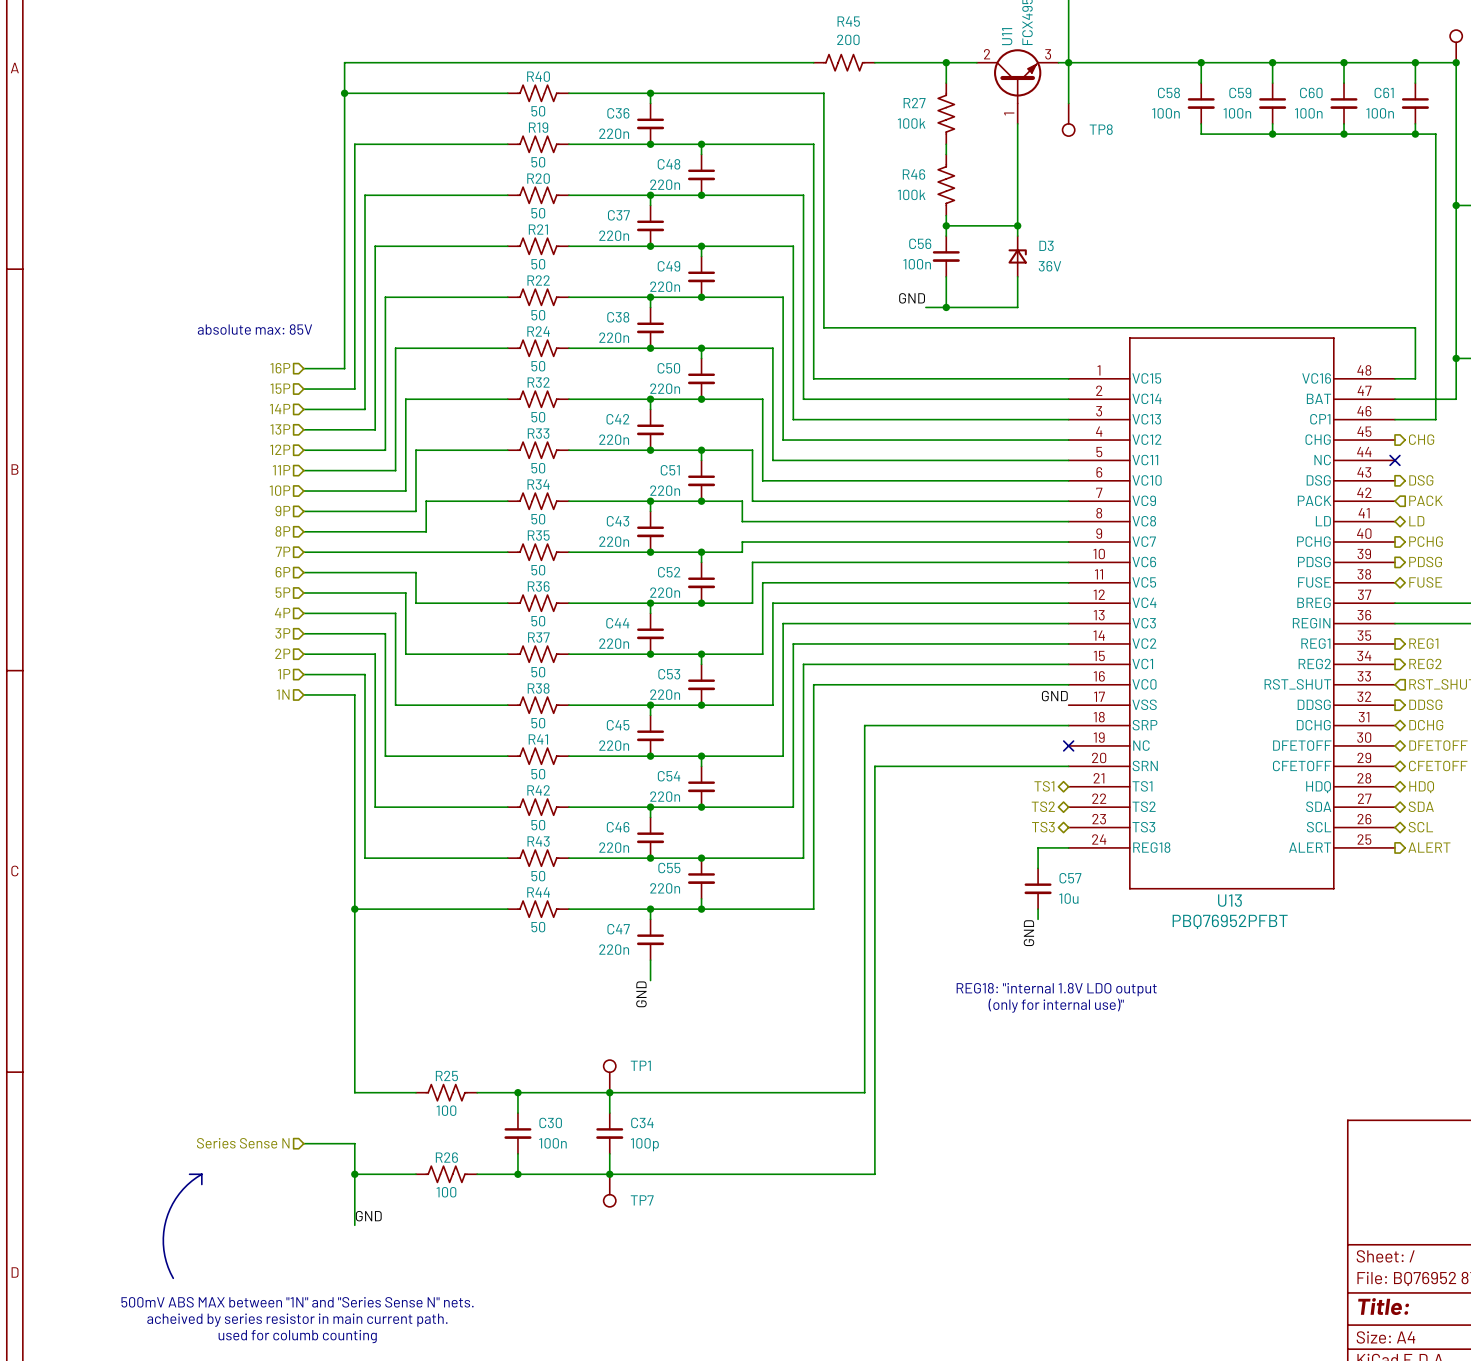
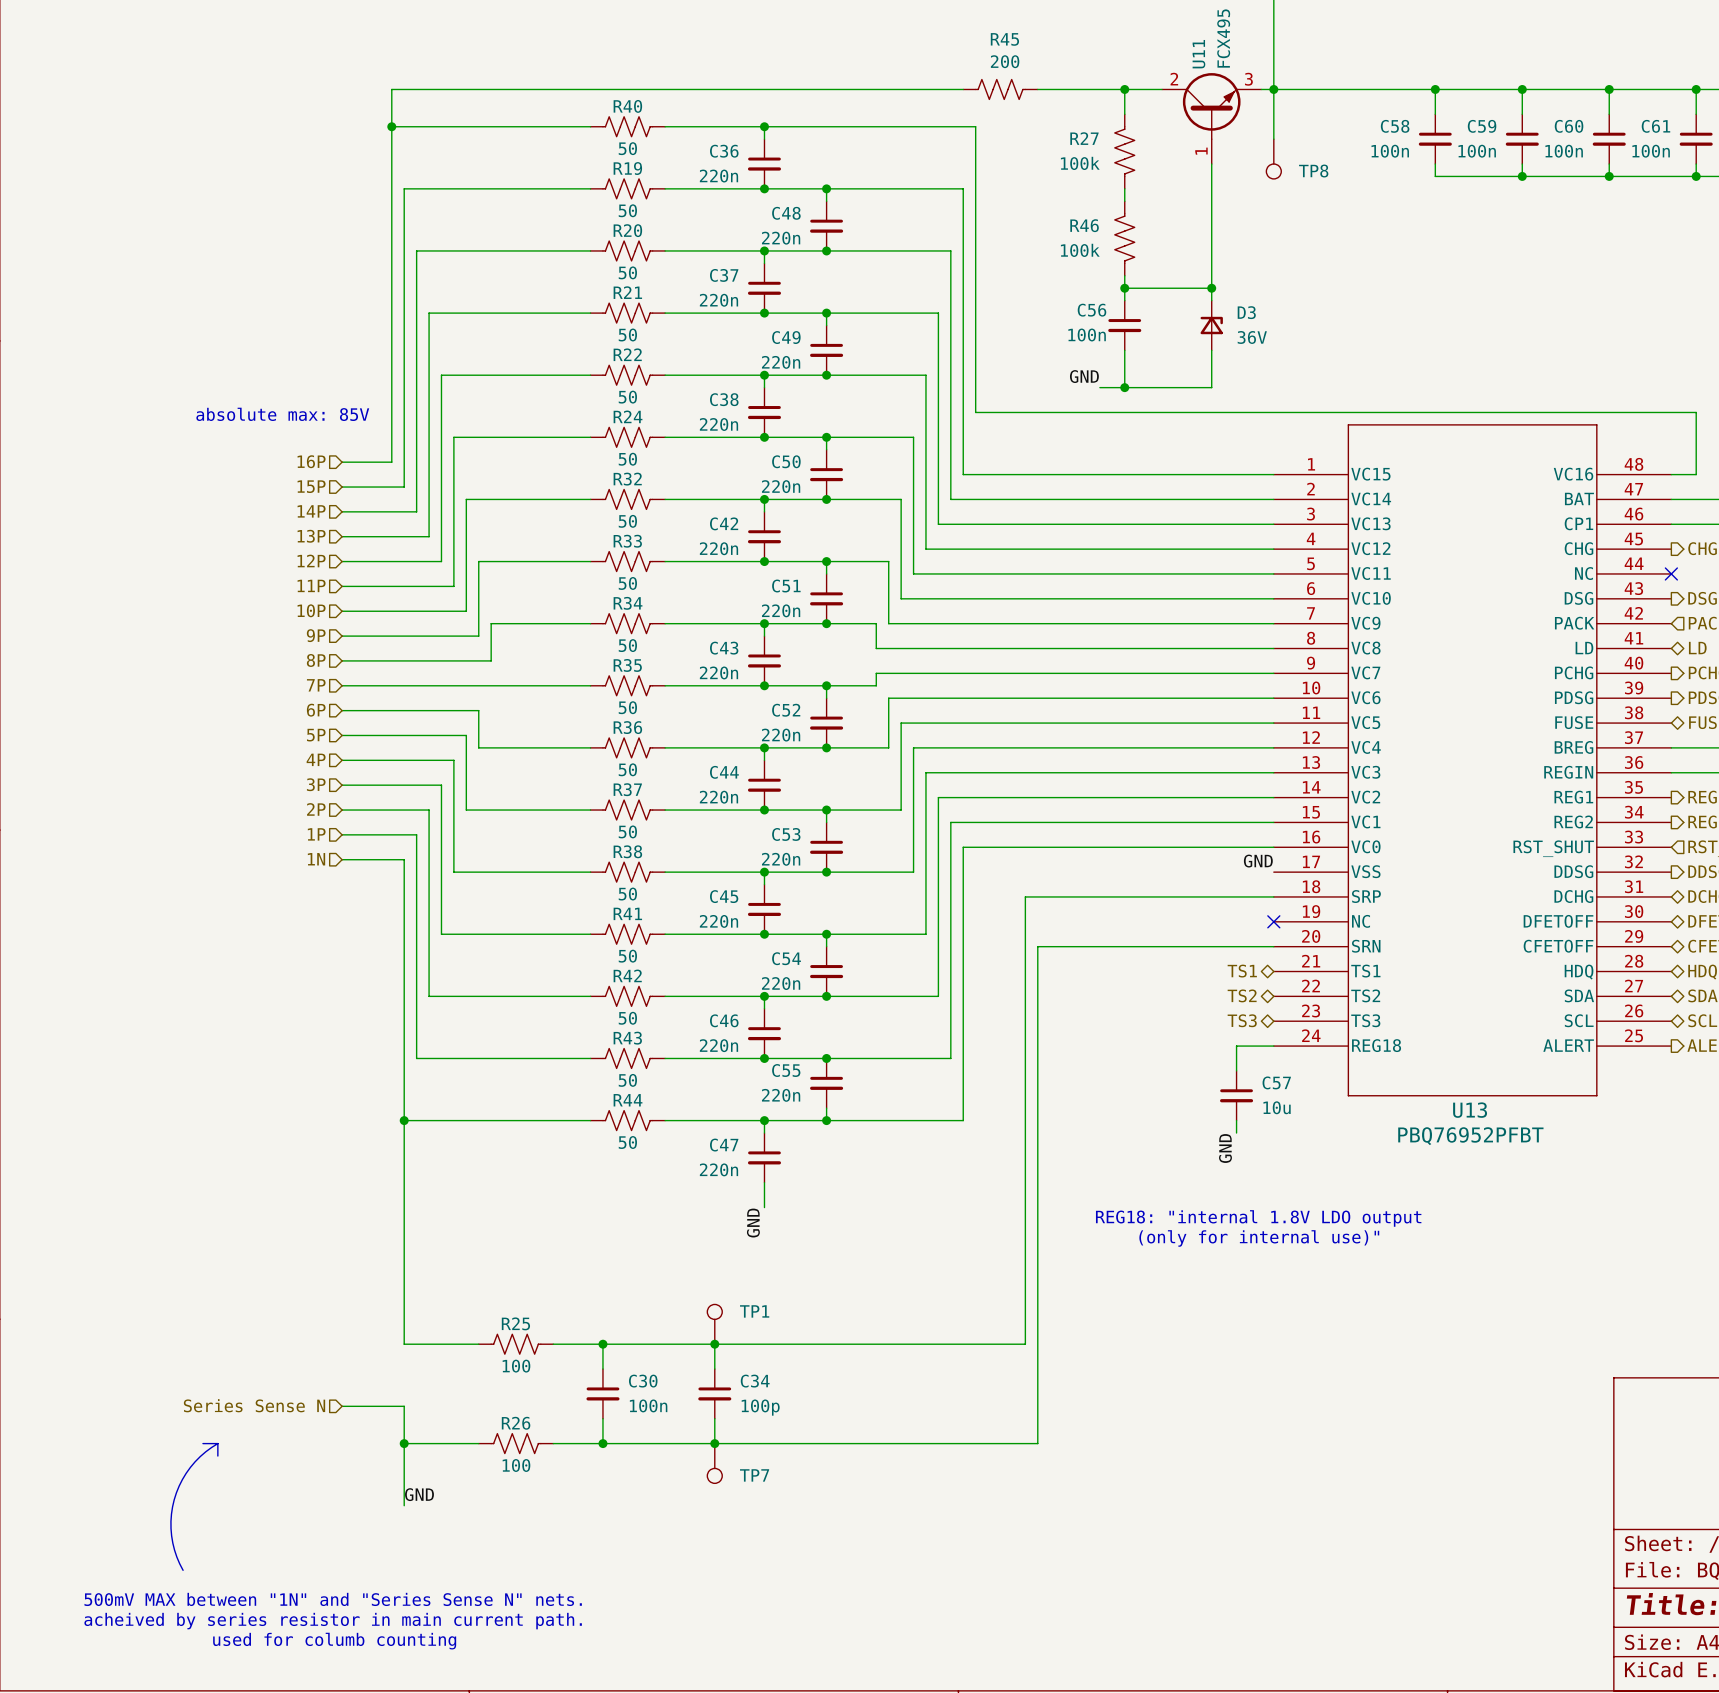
text: 500mV ABS MAX between "1N" and "Series Sense N" nets. (297, 1302) -> 500mV MAX between "1N" and "Series Sense N" nets. (333, 1599)

